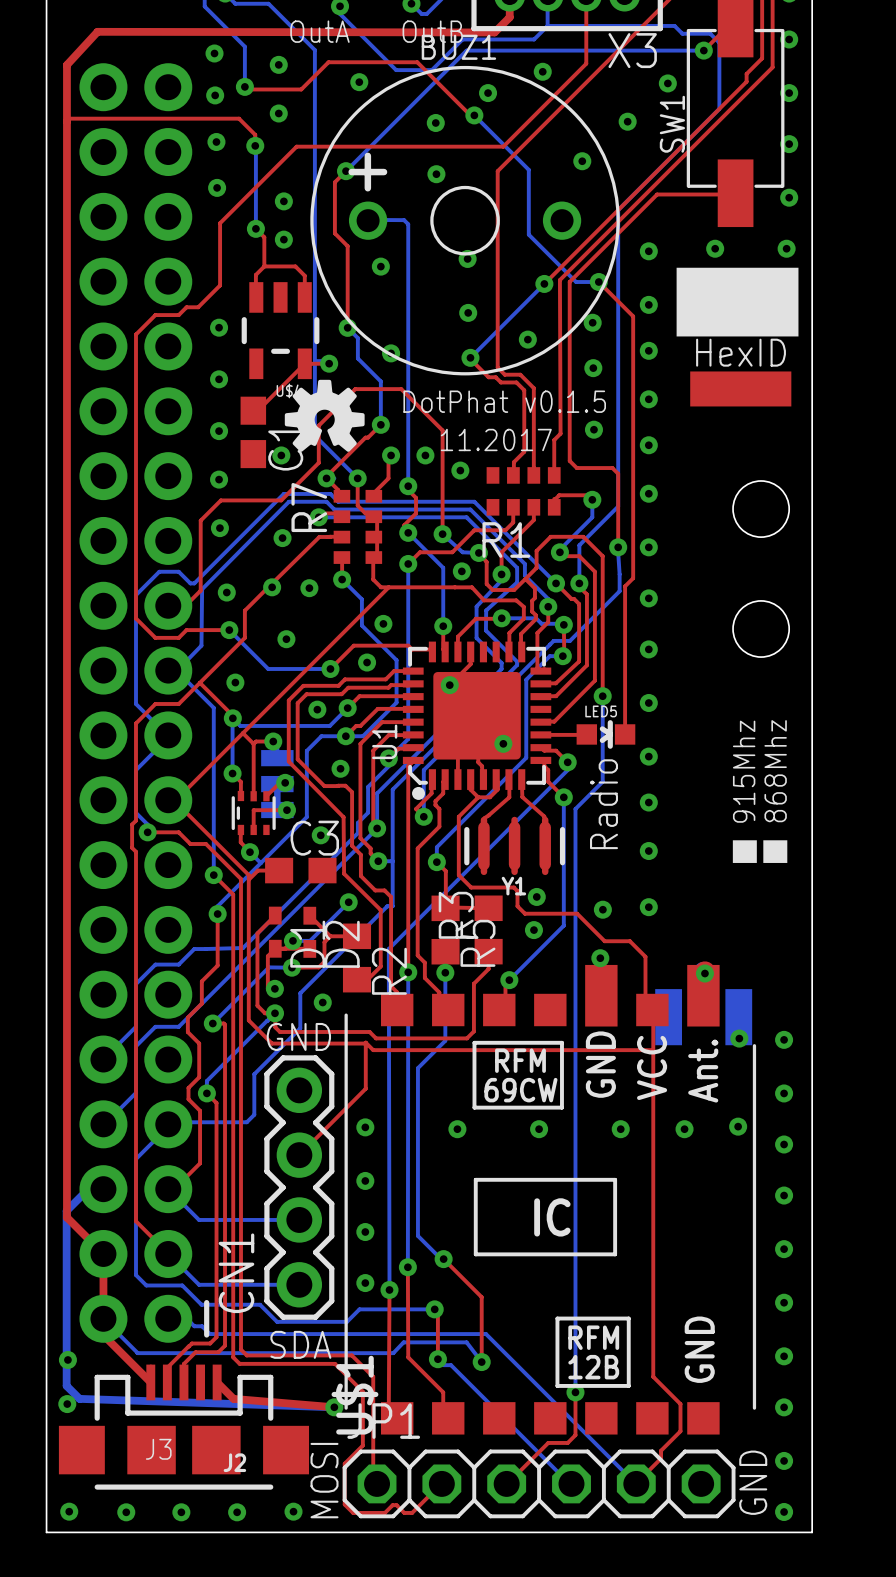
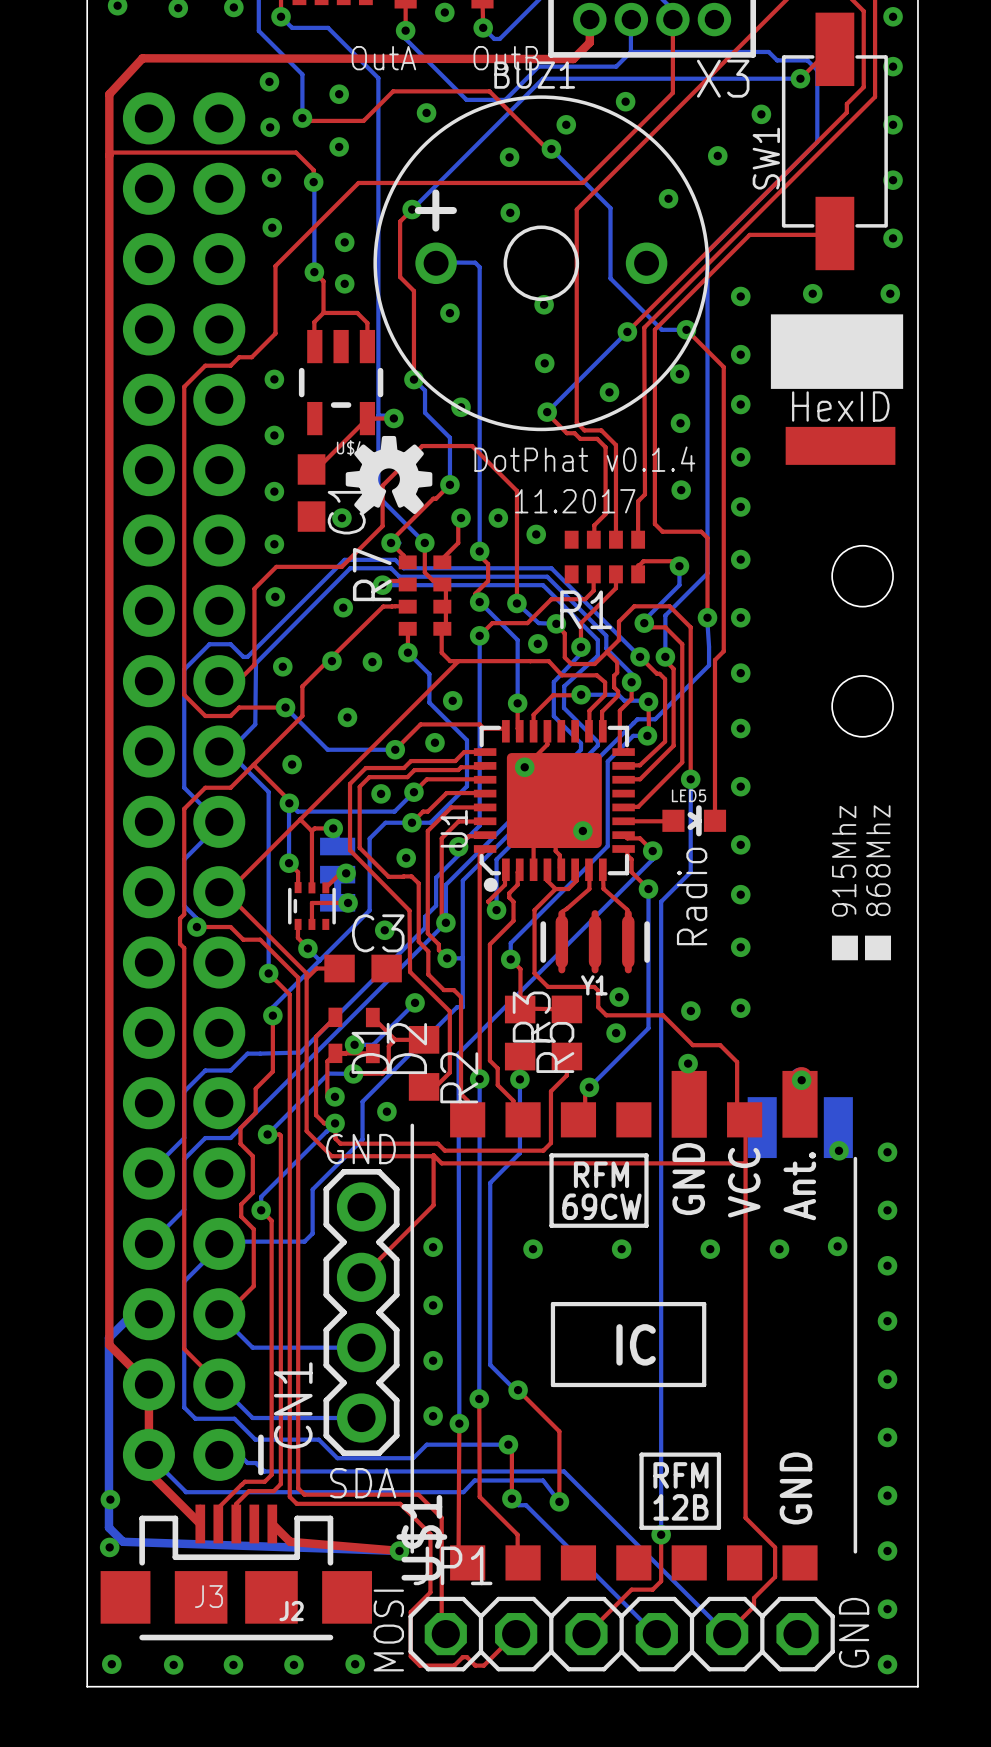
text: DotPhat v0.1.5 (504, 401) -> DotPhat v0.1.4 (584, 459)

